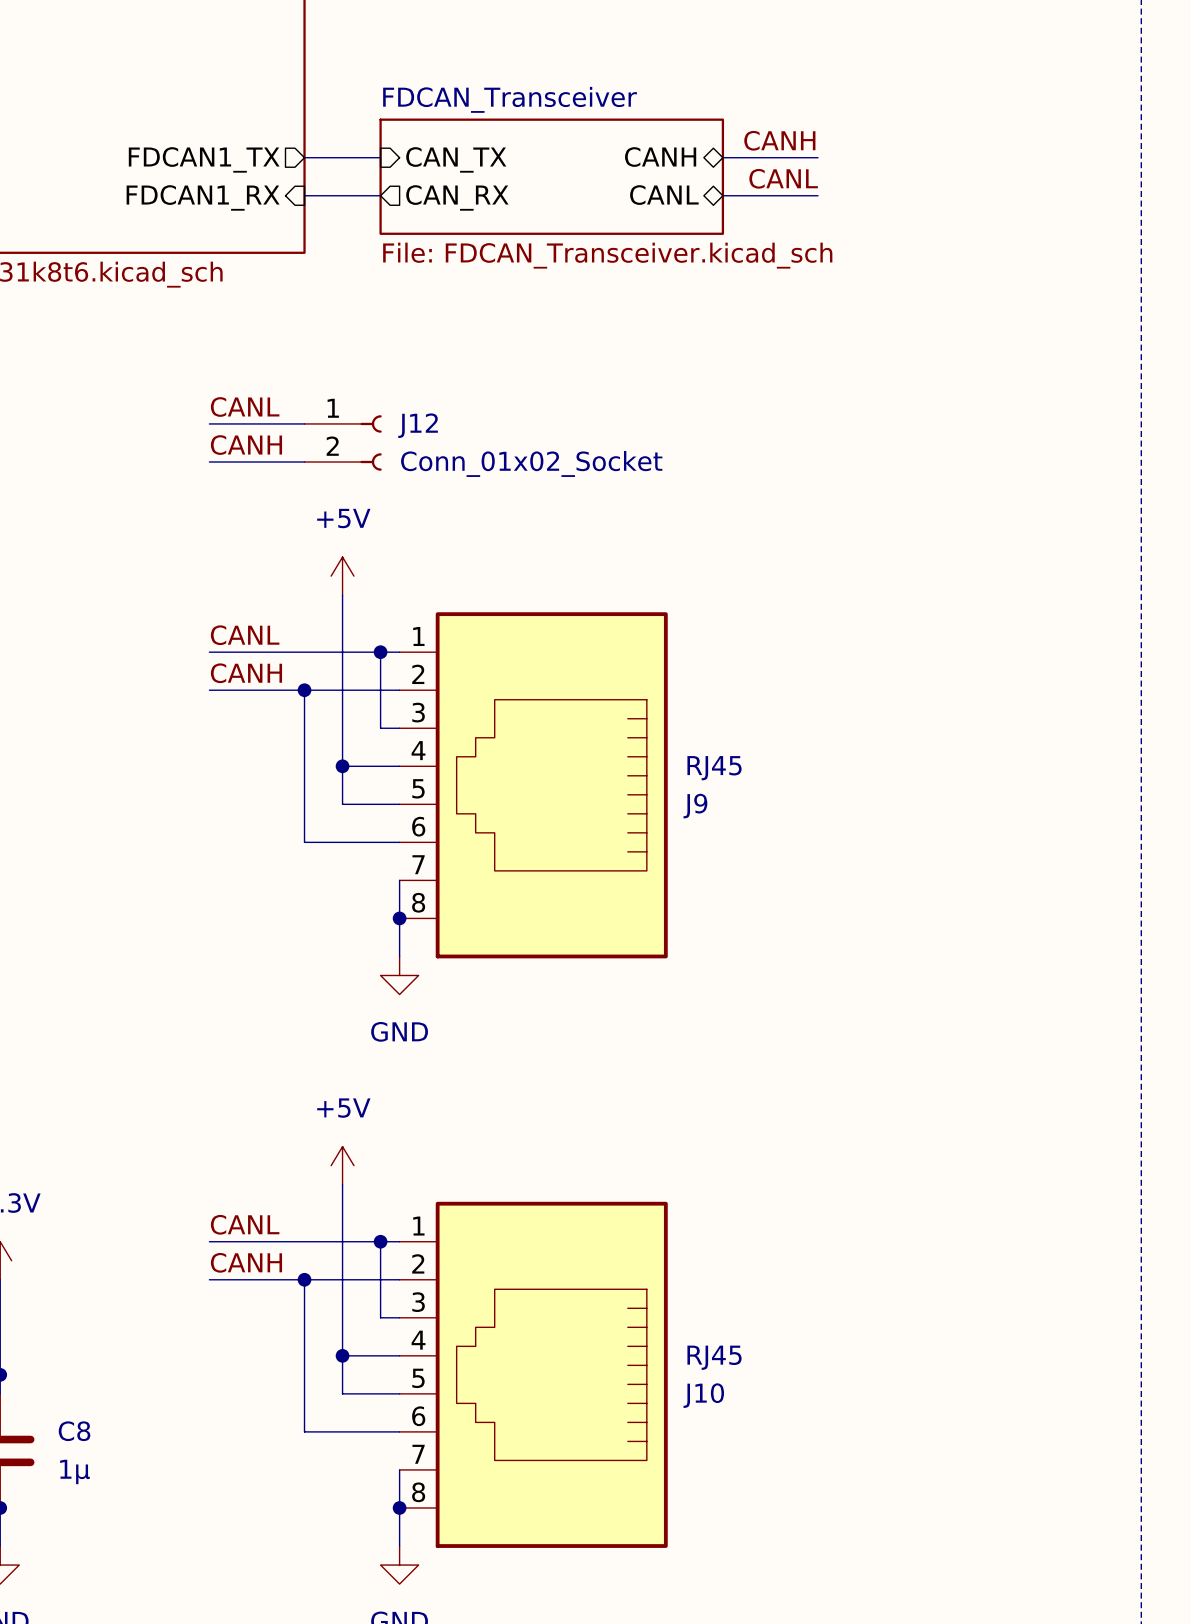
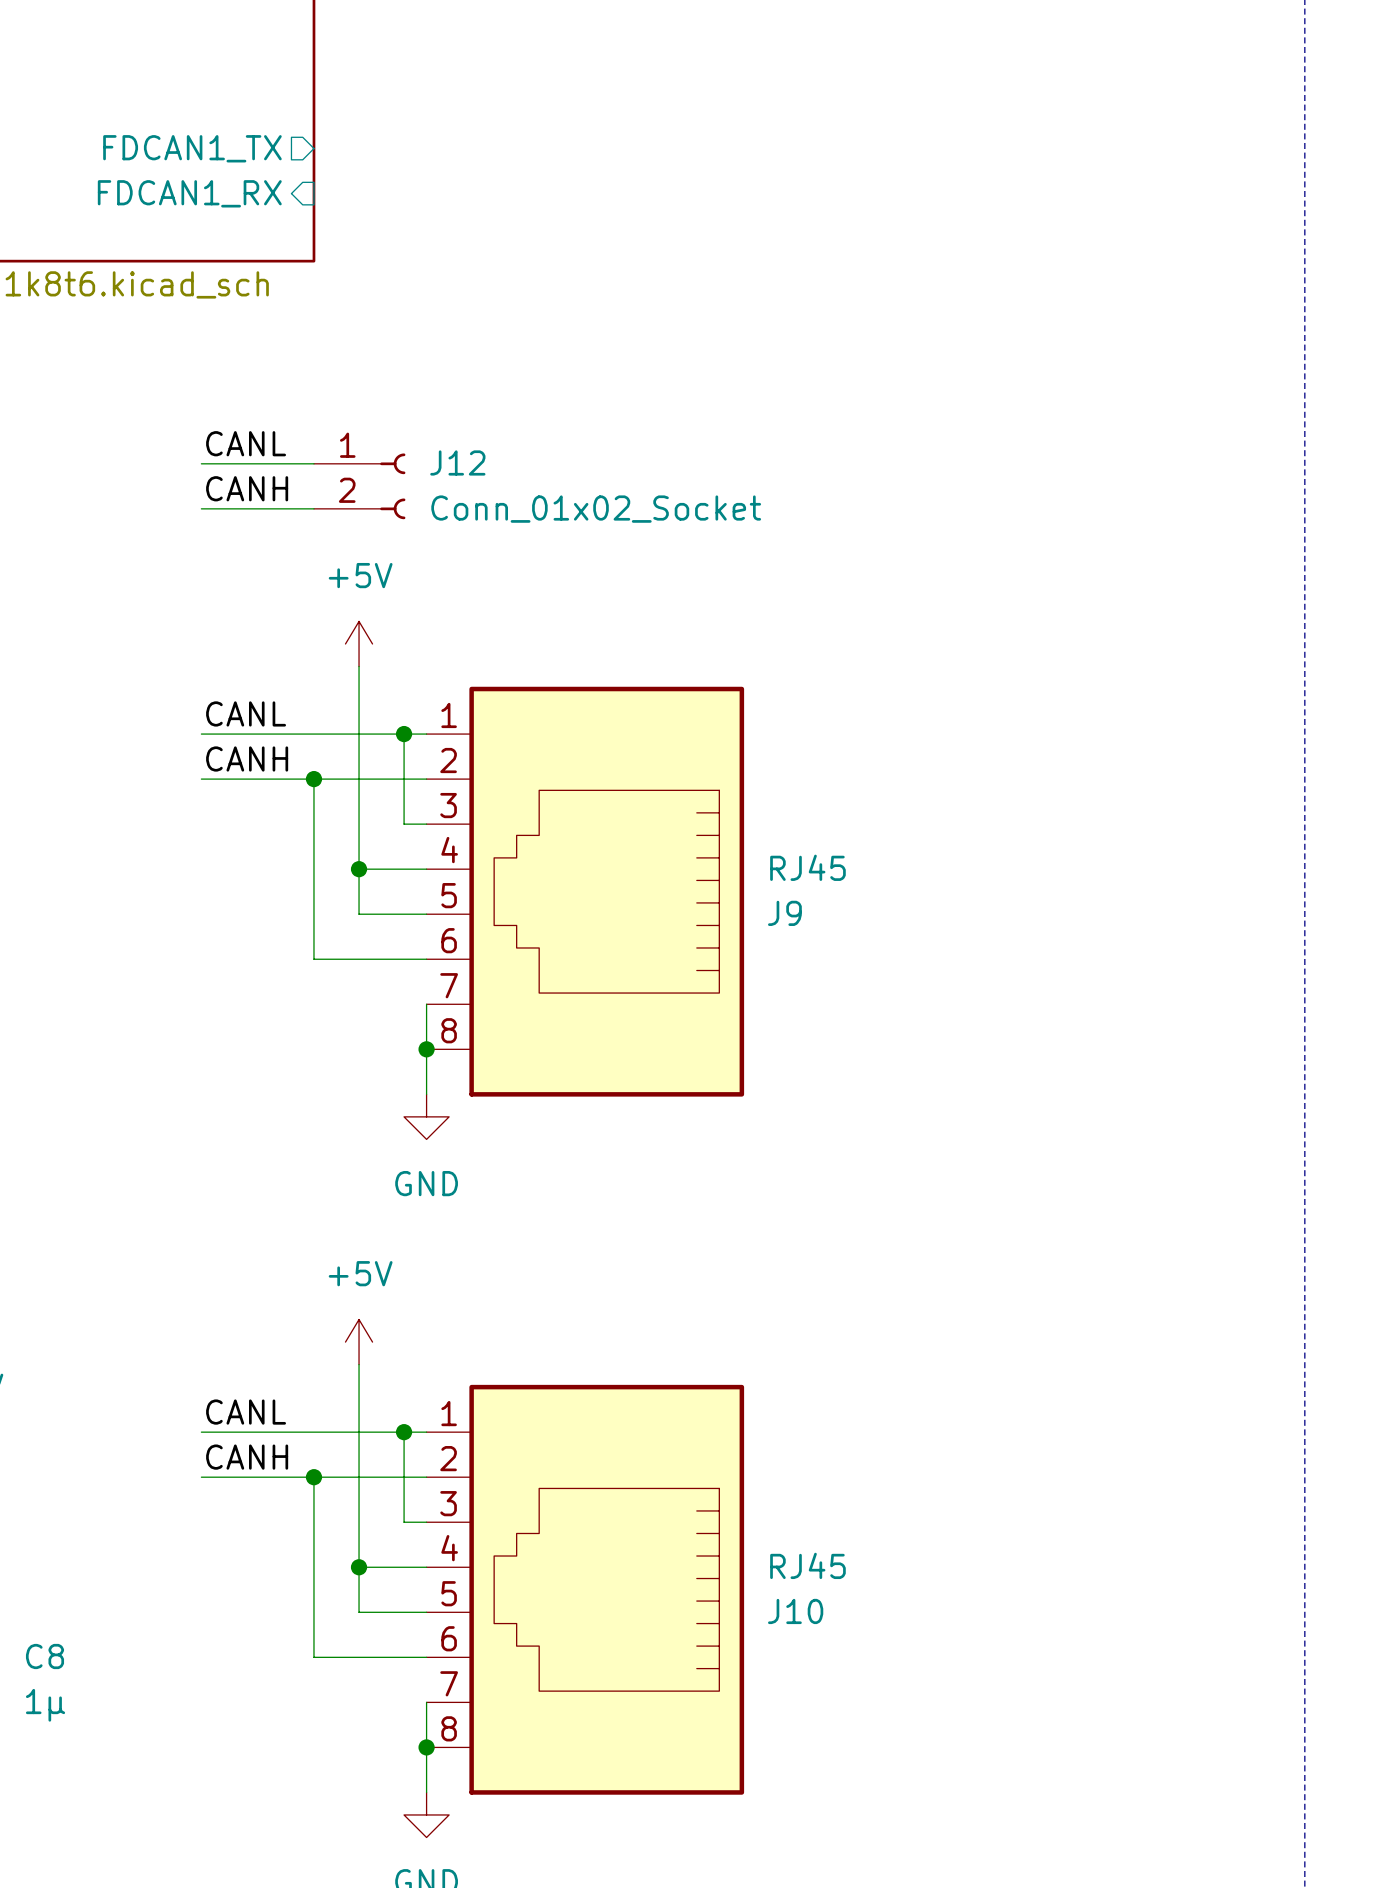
label: CANH (779, 140) -> none
wire: (304, 157) (380, 157) -> none
sheet pin: CANH (660, 157) -> none
wire: (722, 157) (818, 157) -> none
sheet pin: CAN_TX (456, 159) -> none
sheet FDCAN_Transceiver: File: FDCAN_Transceiver.kicad_sch (551, 176) -> none
label: CANL (783, 178) -> none
wire: (304, 195) (380, 195) -> none
sheet pin: CANL (664, 195) -> none
wire: (722, 195) (818, 195) -> none
sheet pin: CAN_RX (457, 197) -> none

